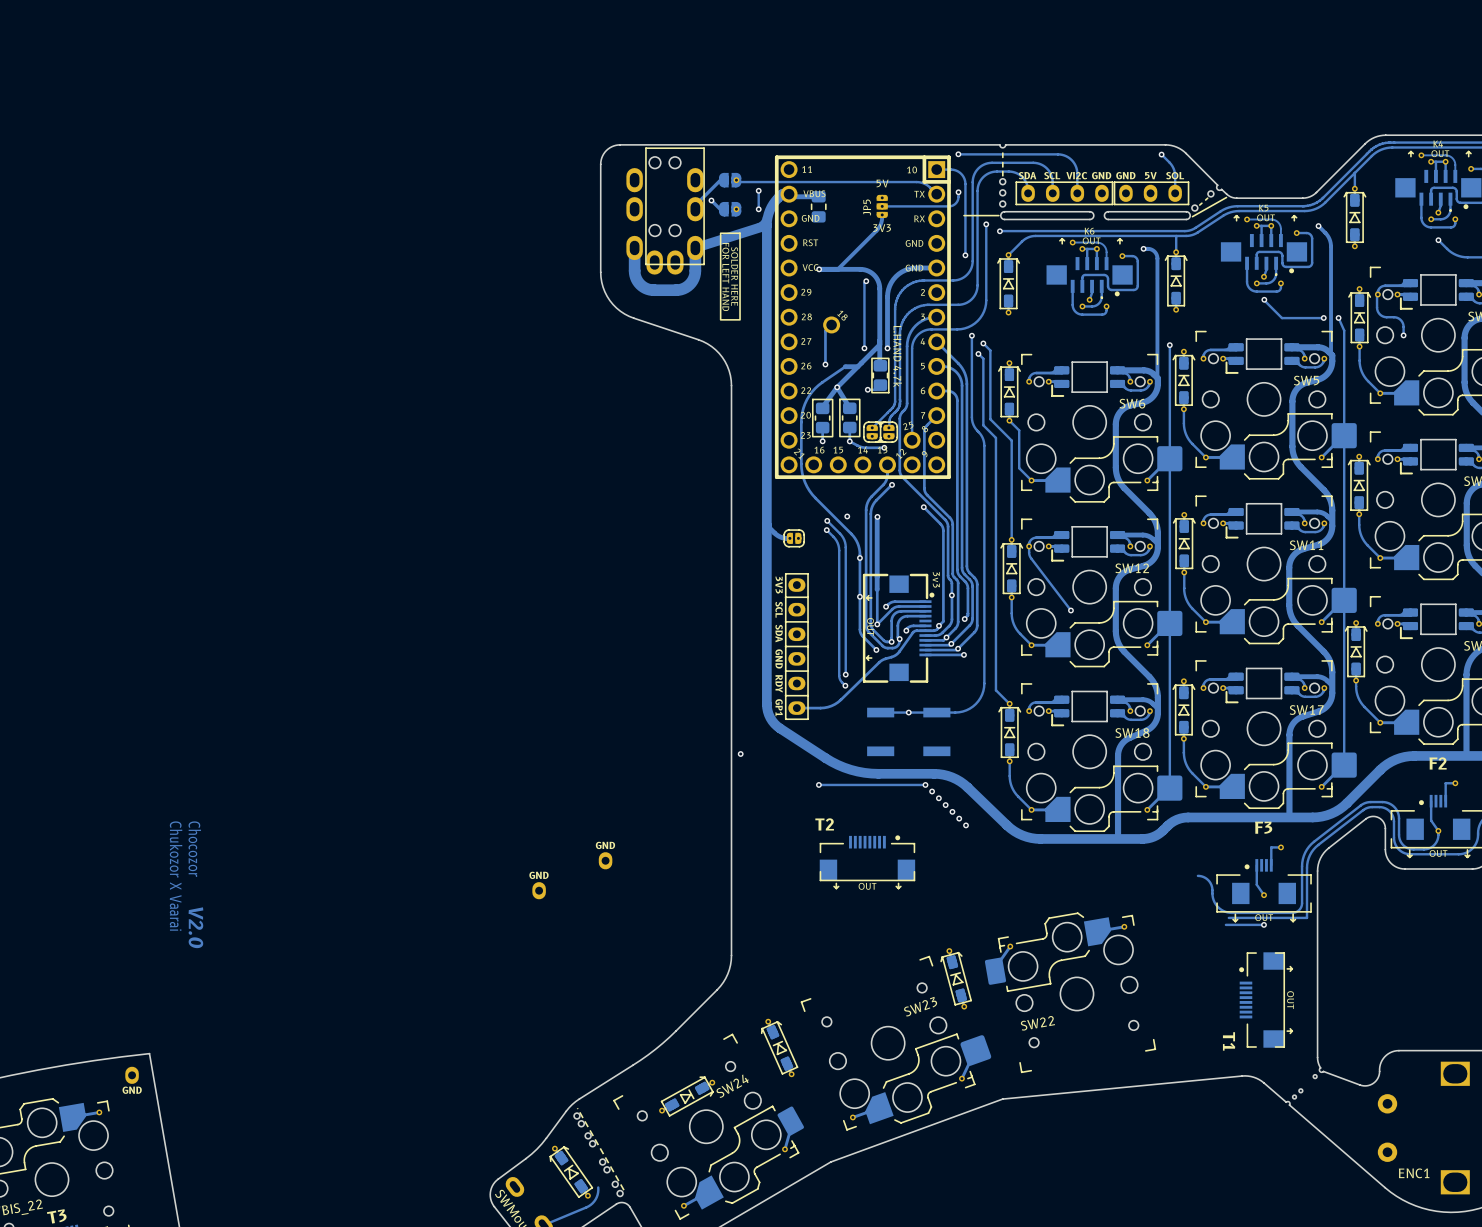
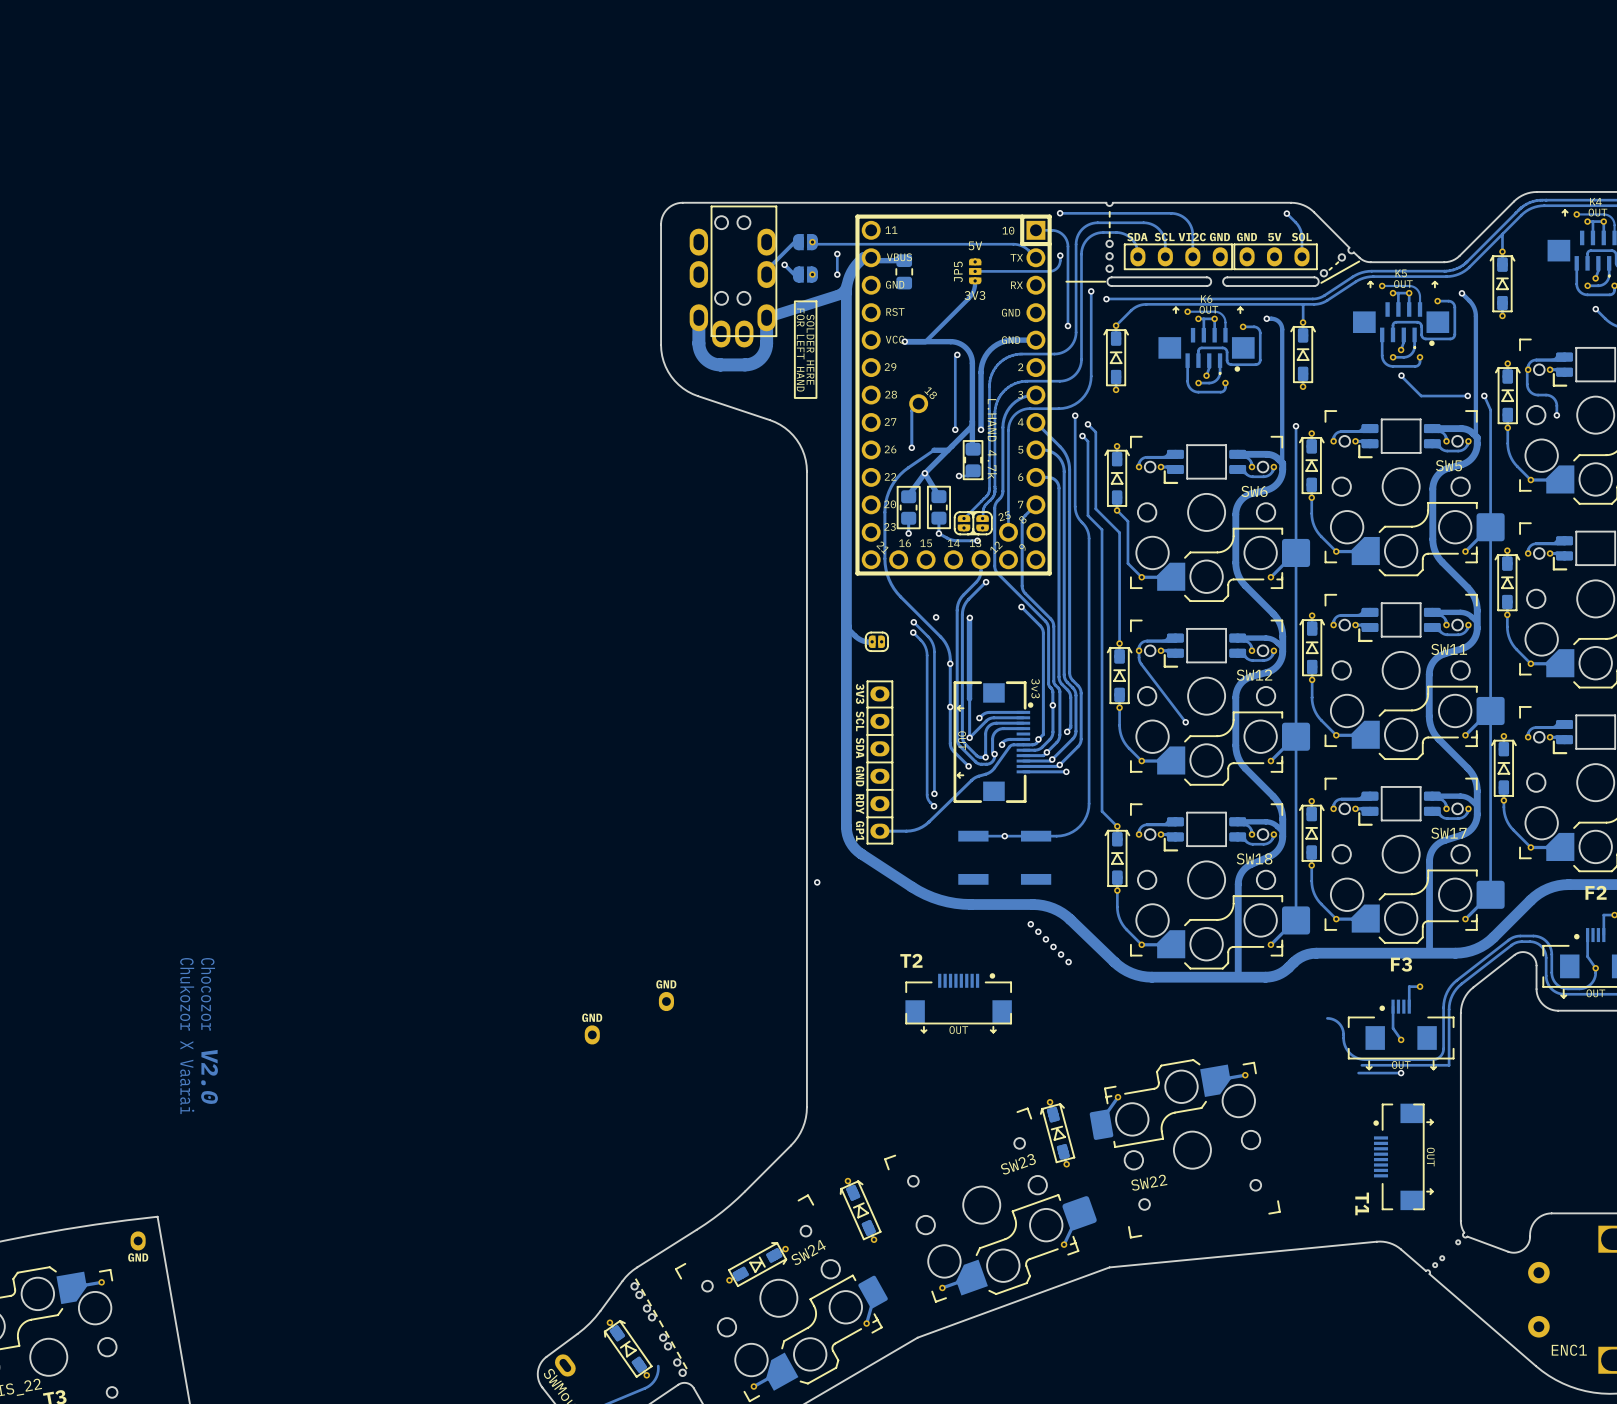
via: (818, 784) -> none
track: (925, 784) (818, 784) -> none
via: (925, 784) -> none

